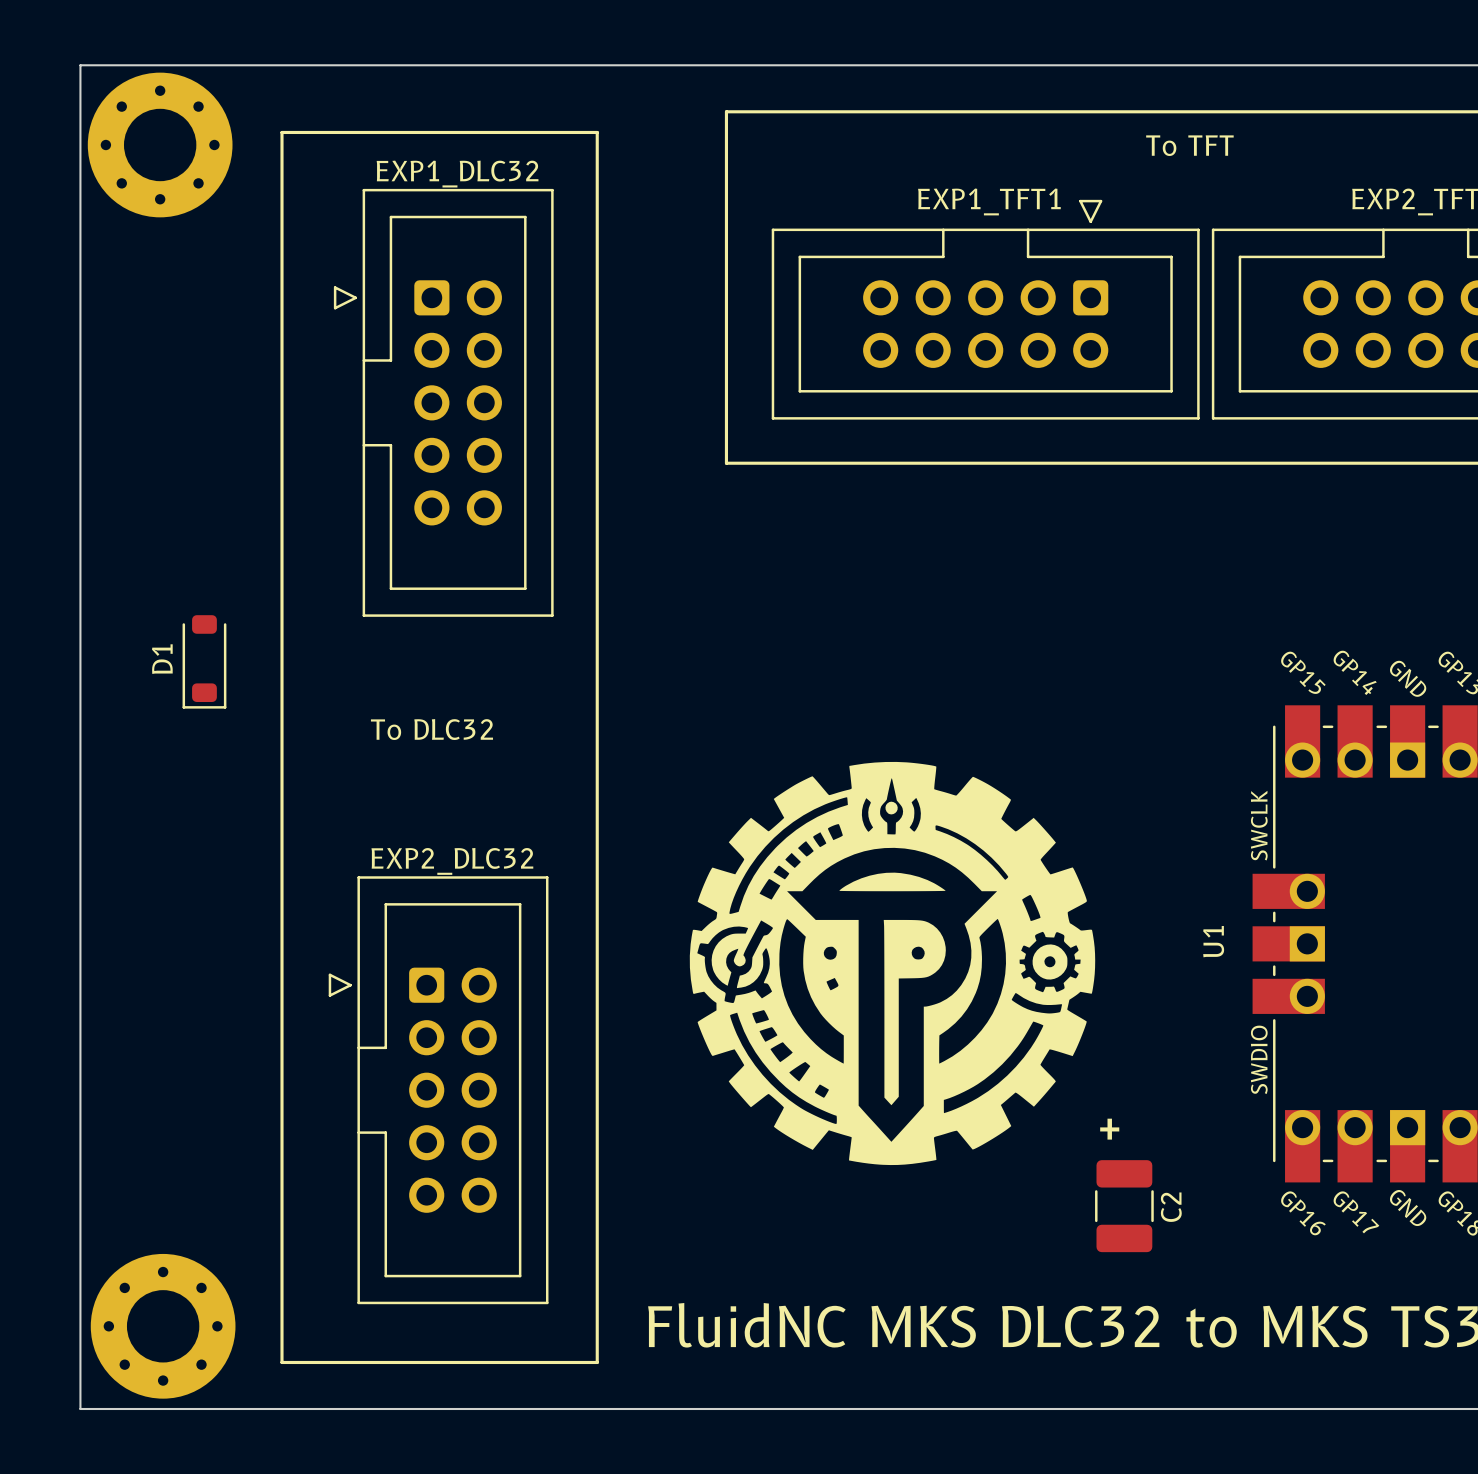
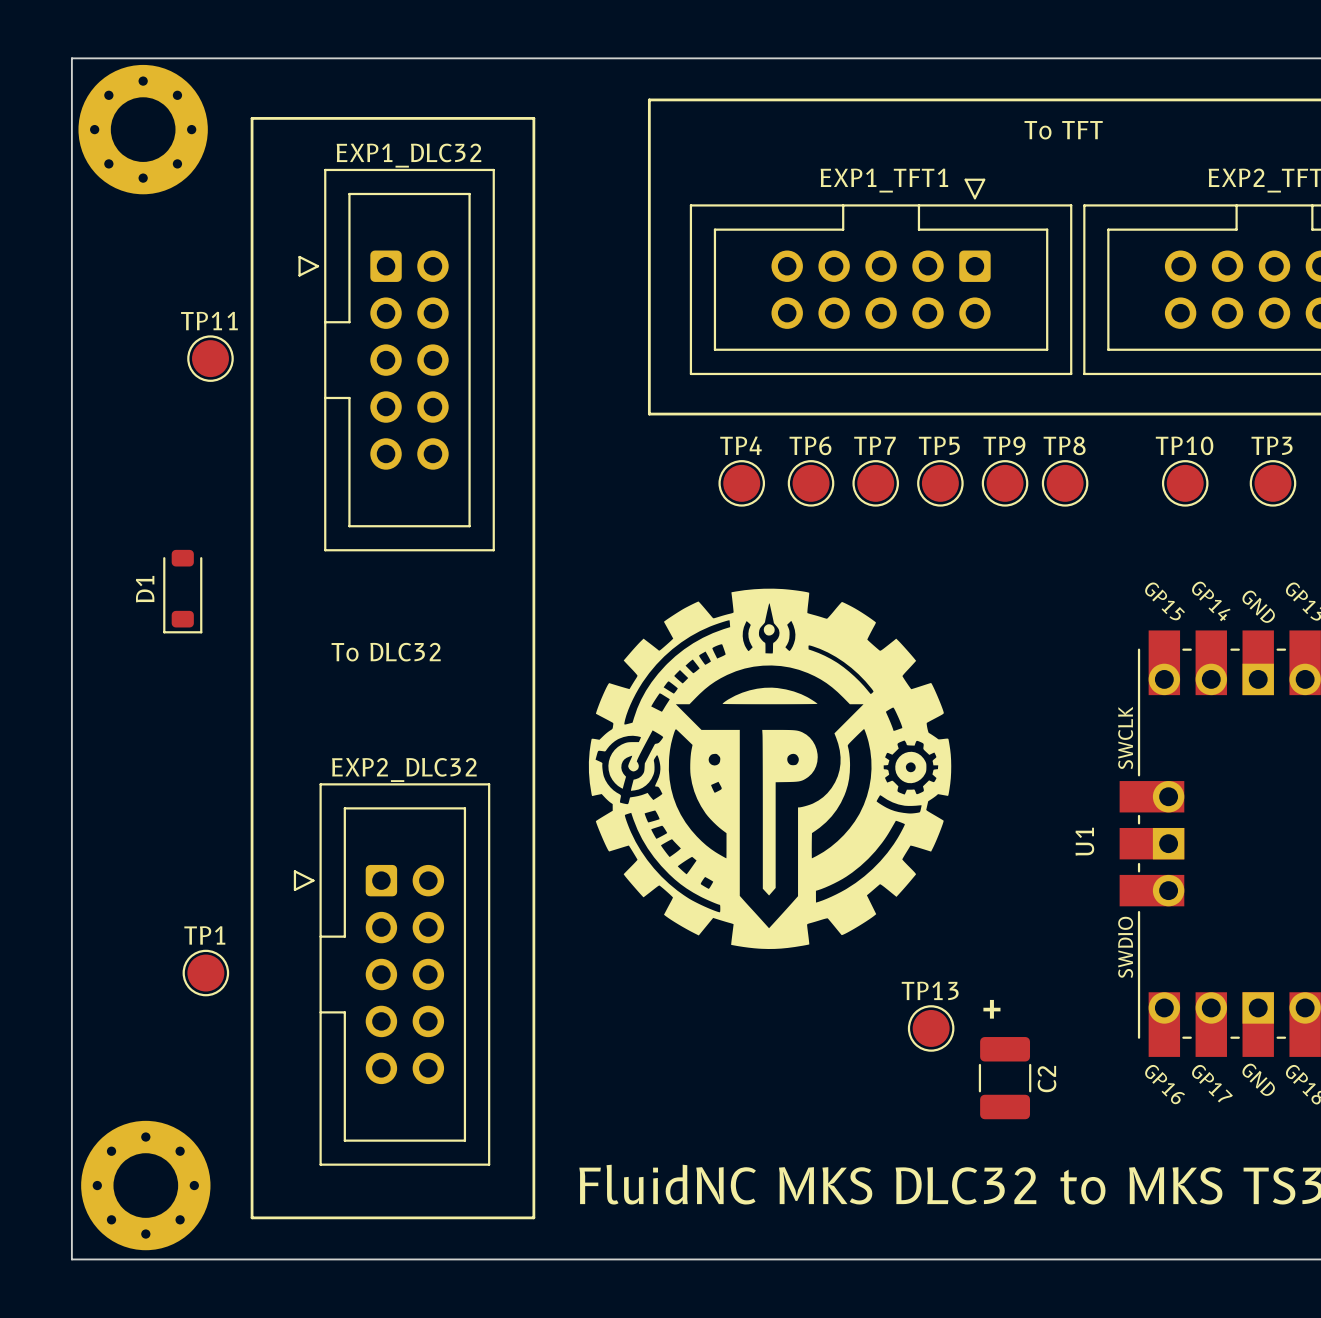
TP11: none -> (210, 358)
TP4: none -> (741, 483)
TP6: none -> (811, 483)
TP7: none -> (875, 483)
TP5: none -> (940, 483)
TP9: none -> (1005, 483)
TP8: none -> (1065, 483)
TP10: none -> (1185, 483)
TP3: none -> (1273, 483)
drawing position: (892, 963) -> (770, 768)
TP1: none -> (205, 973)
TP13: none -> (931, 1028)

